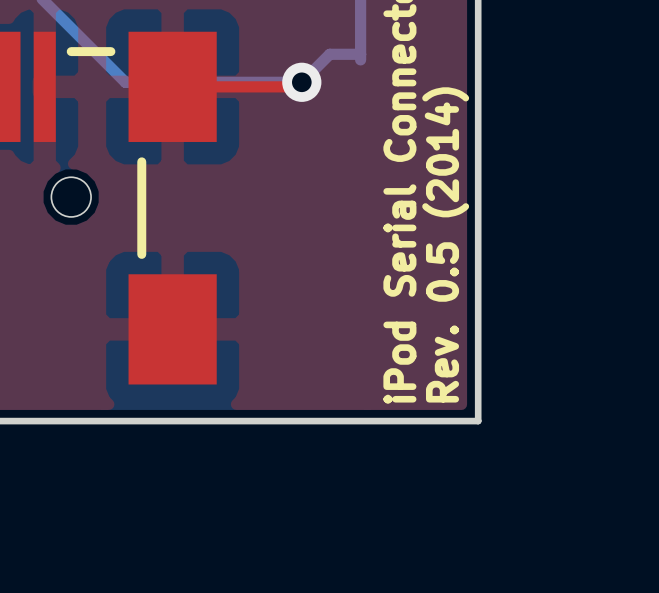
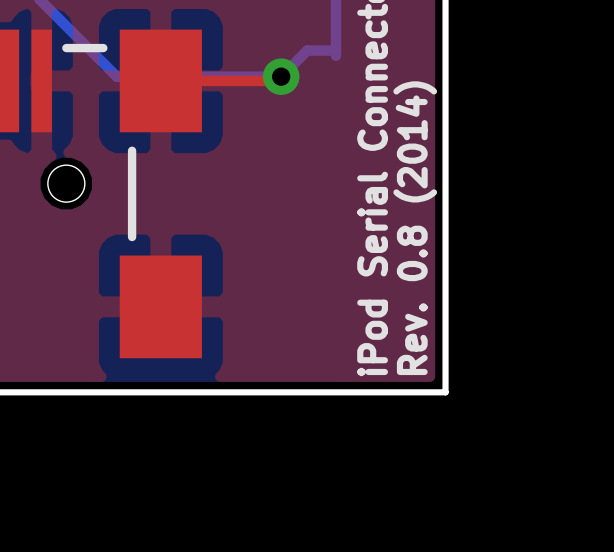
text: Rev. 0.5 (2014) (445, 244) -> Rev. 0.8 (2014) (415, 228)

